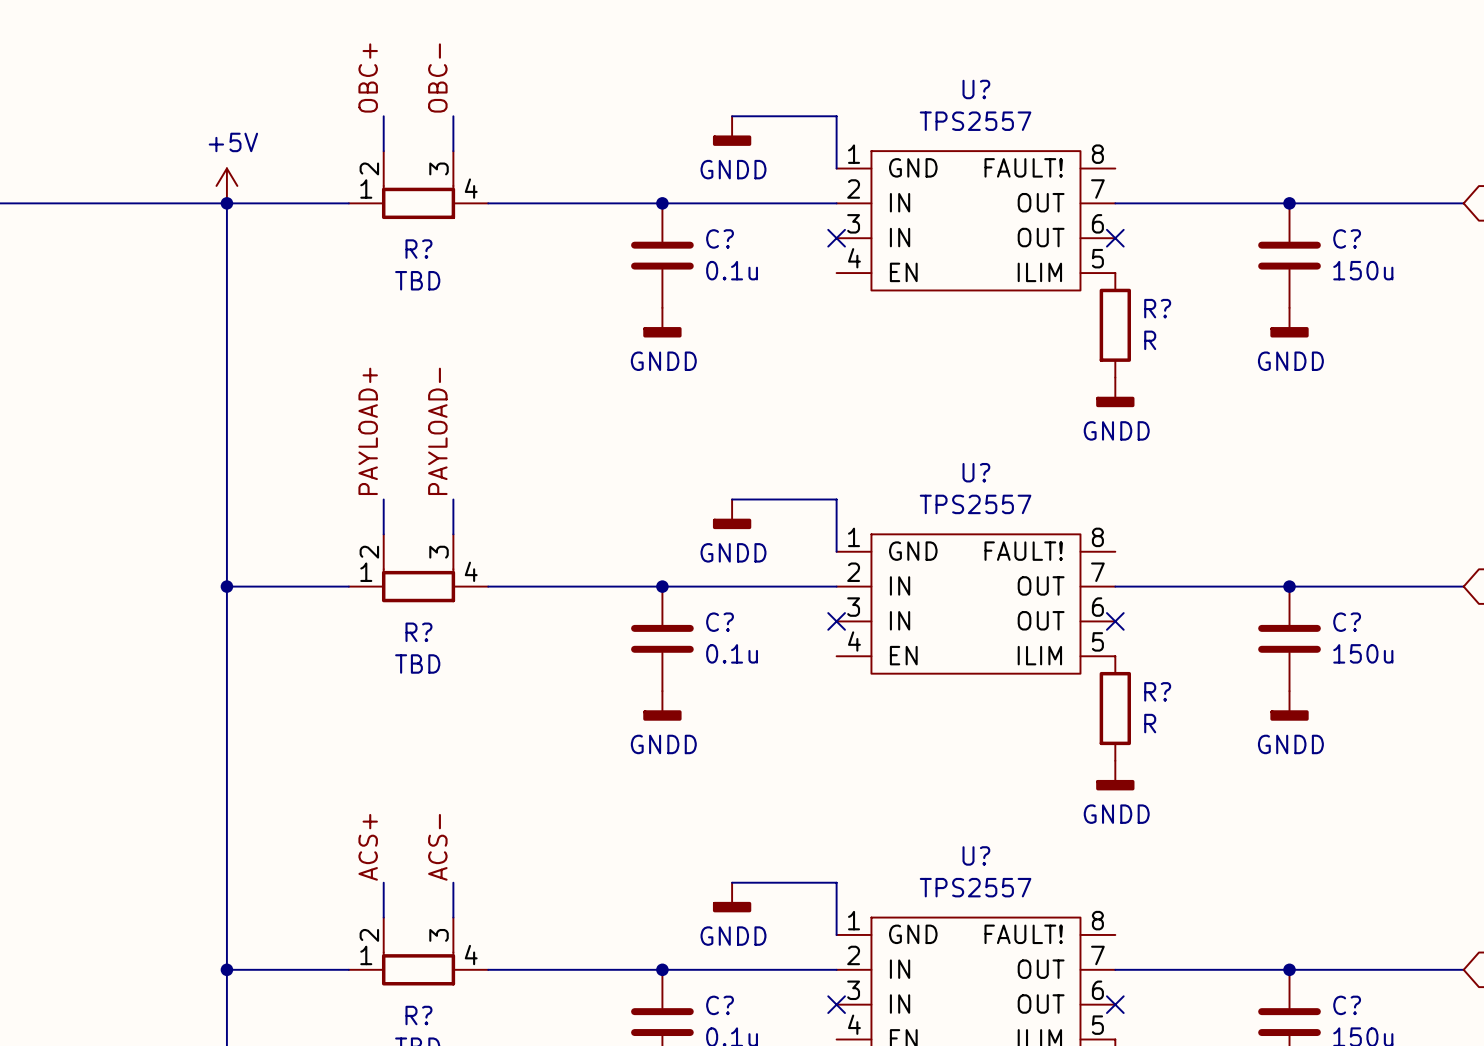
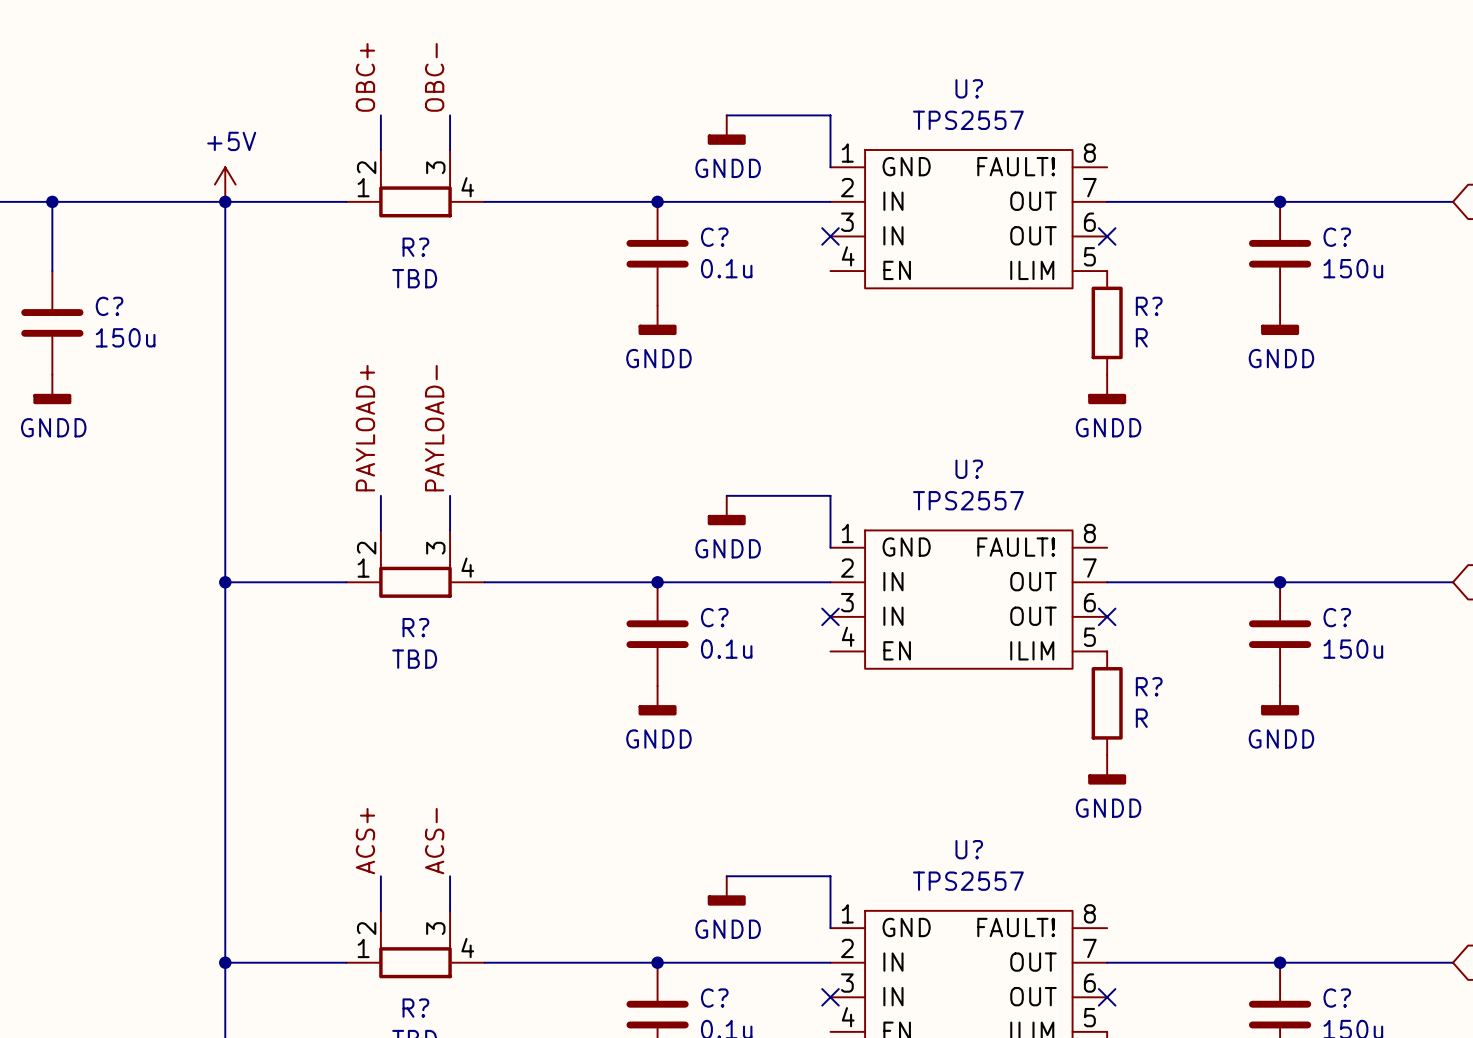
wire: none -> (52, 201) (52, 271)
junction: none -> (52, 201)
C?: none -> 150u (52, 322)
power symbol: none -> GNDD (52, 389)

